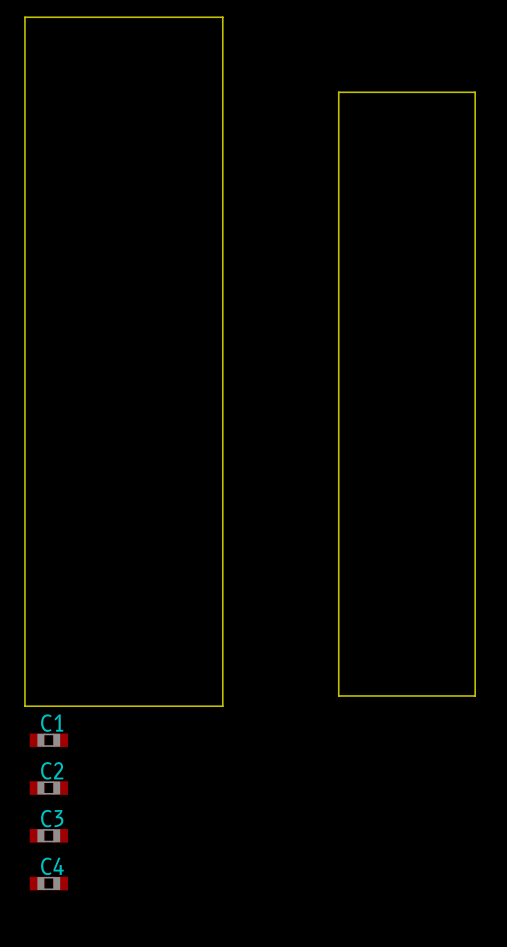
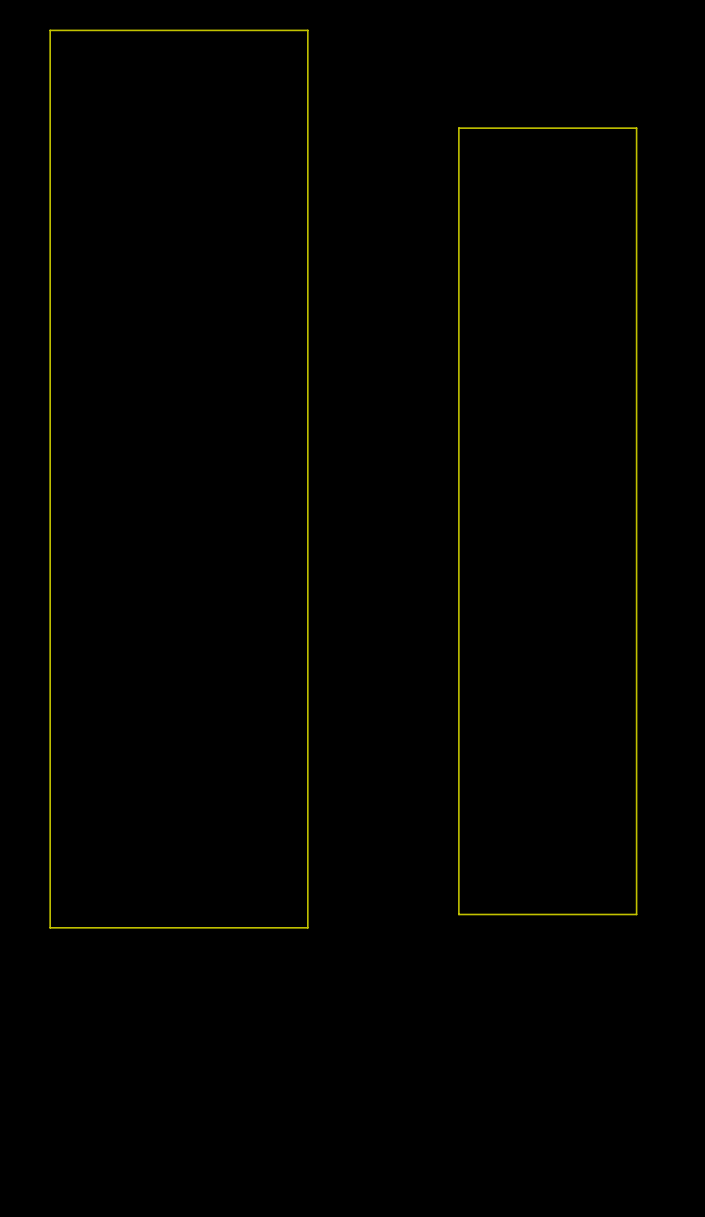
C1: (48, 740) -> none
C2: (48, 788) -> none
C3: (48, 835) -> none
C4: (48, 883) -> none

